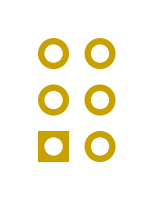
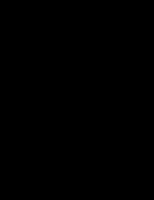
part: (76, 100) -> none

